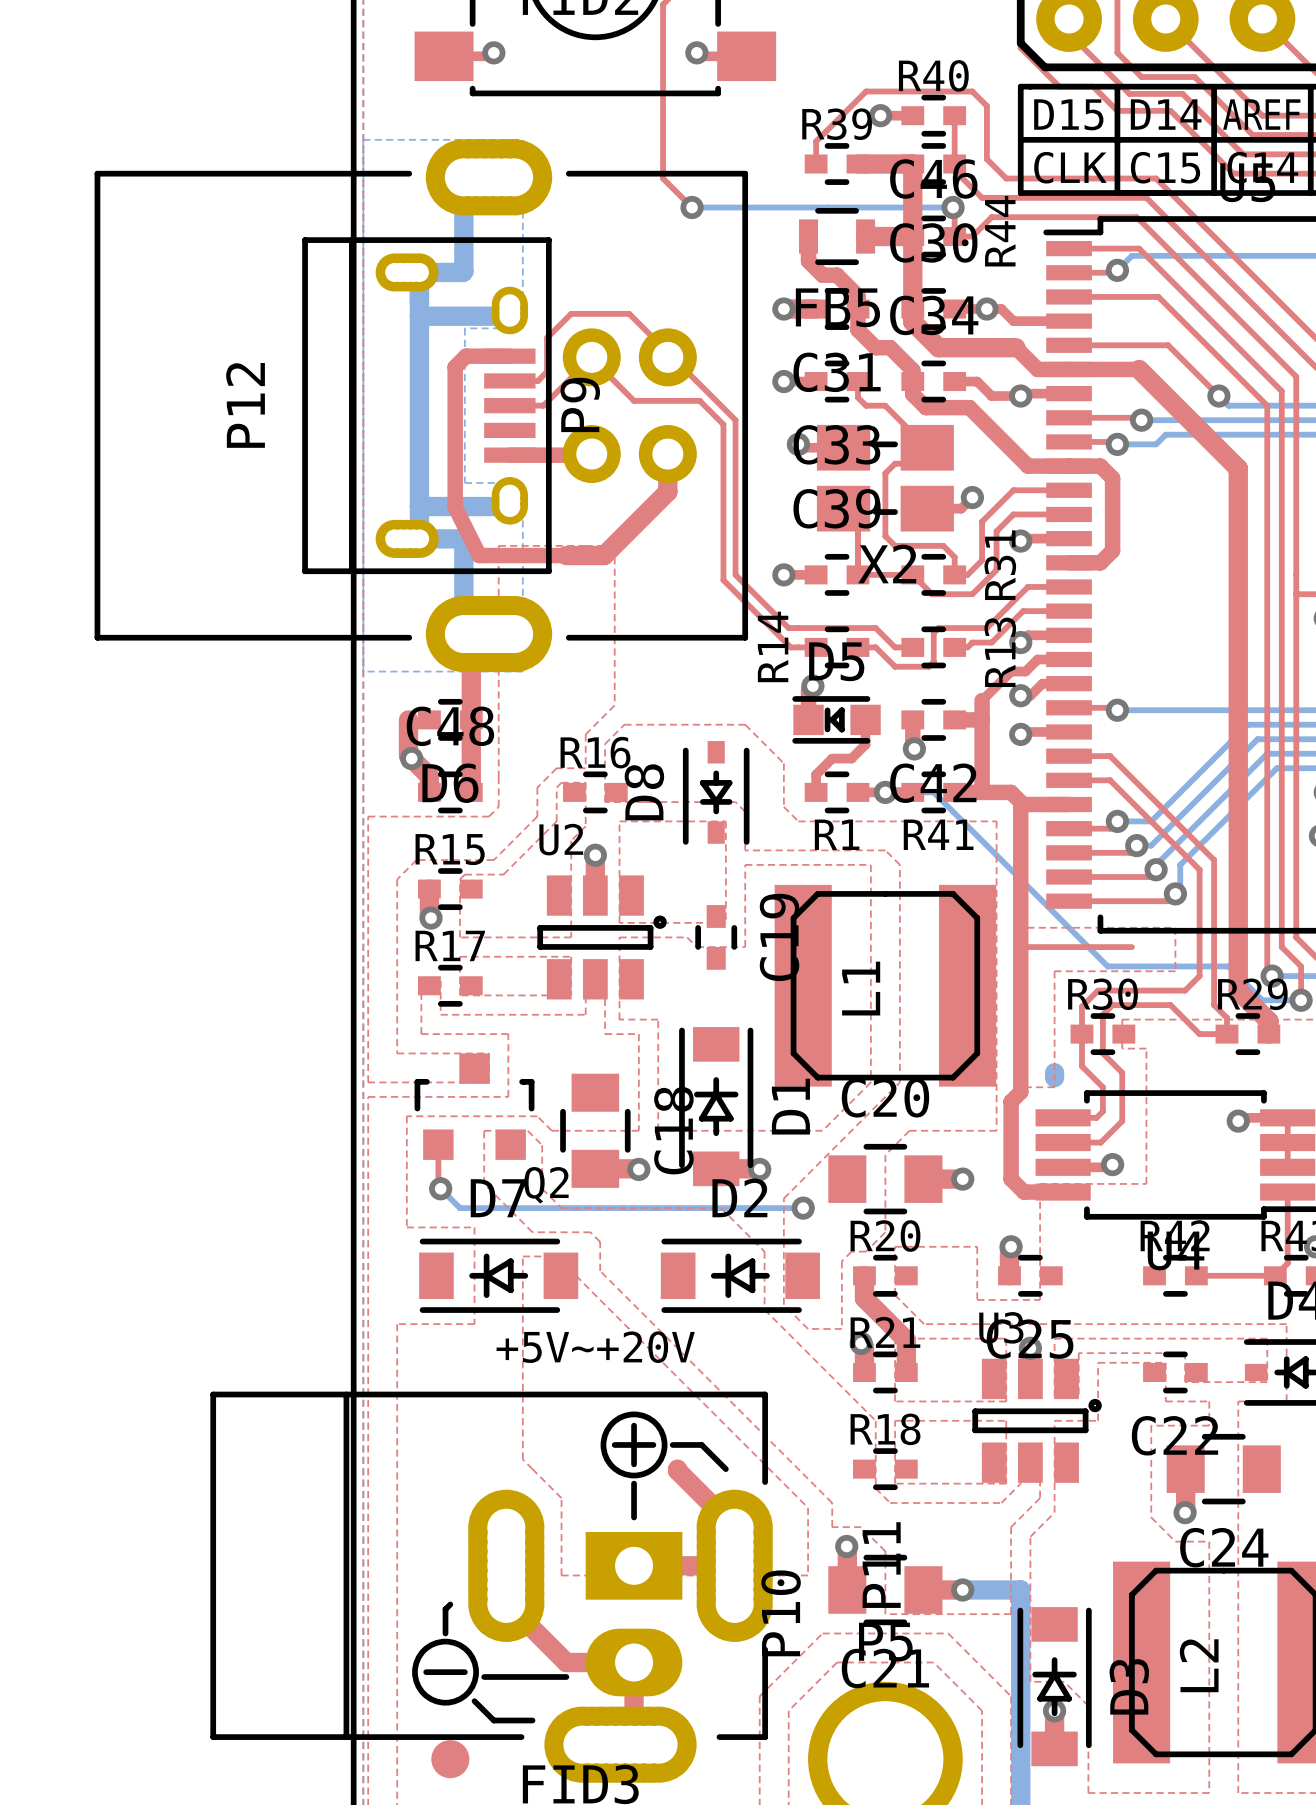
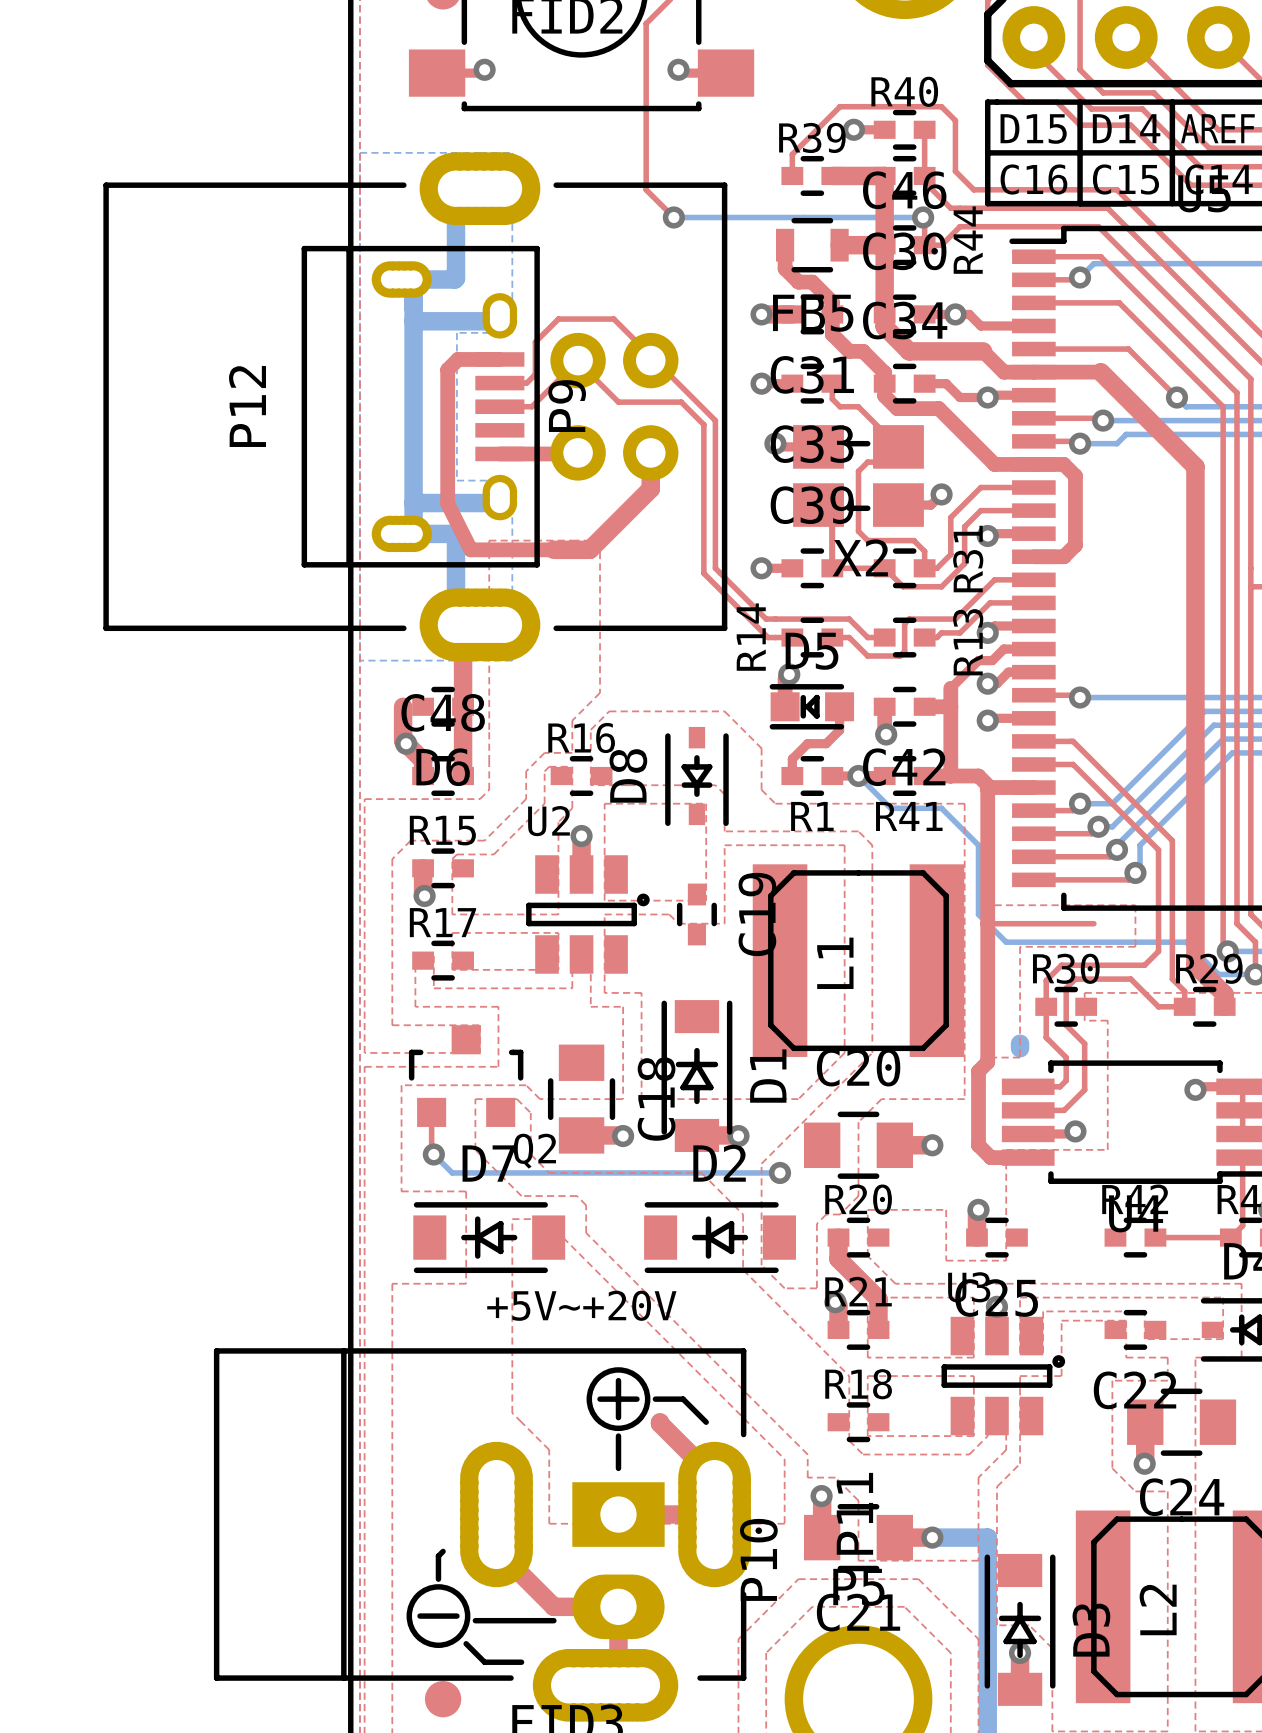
text: CLK (1070, 167) -> C16 (1033, 179)
bottom track: (885, 792) (933, 792) (1107, 966) -> (858, 776) (890, 808) (941, 808) (978, 845) (978, 914) (1006, 942) (1070, 942)

